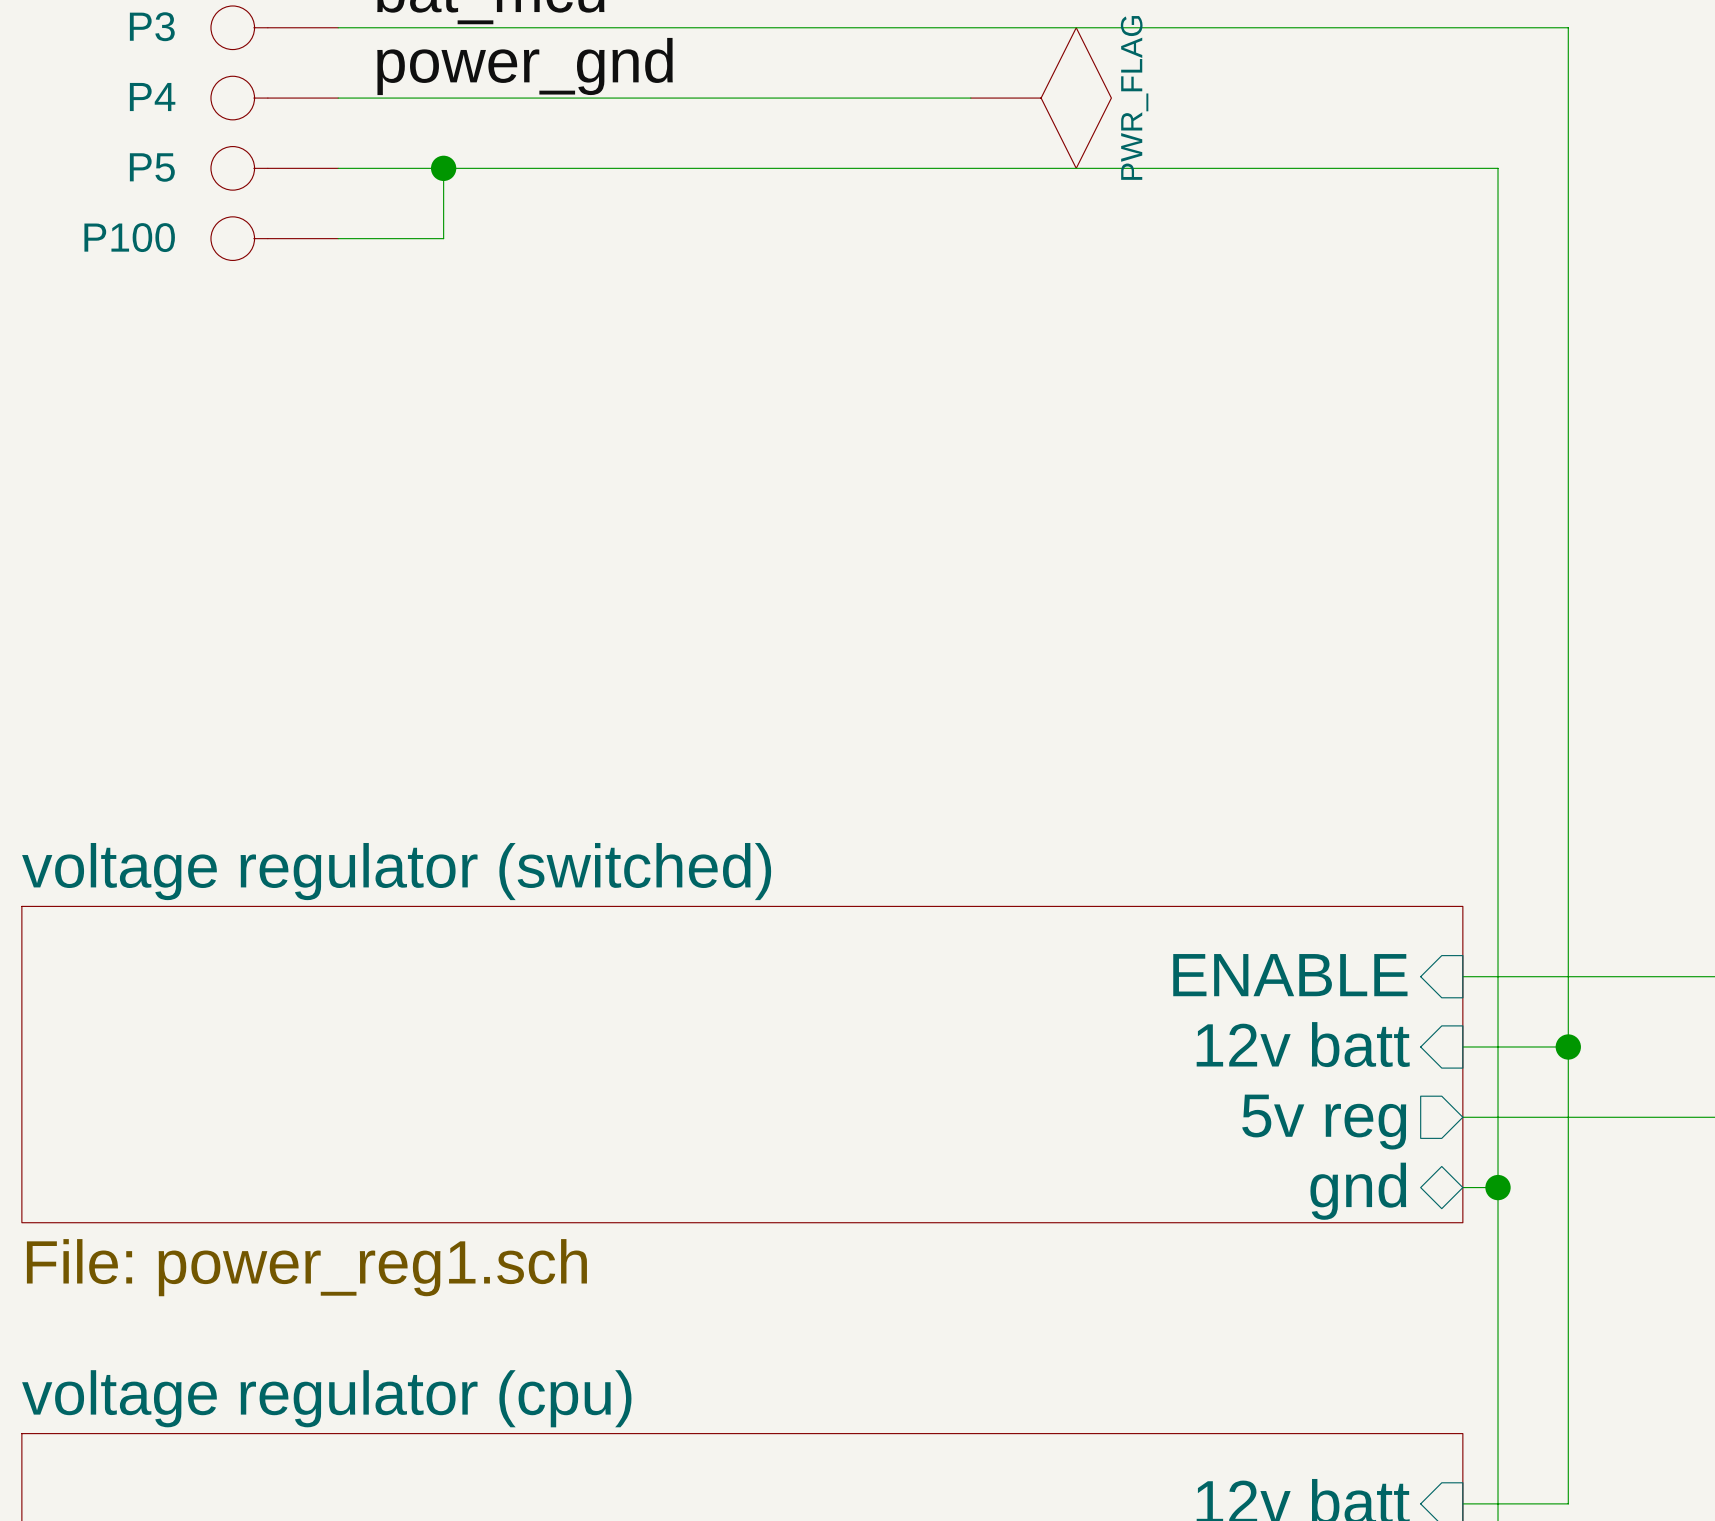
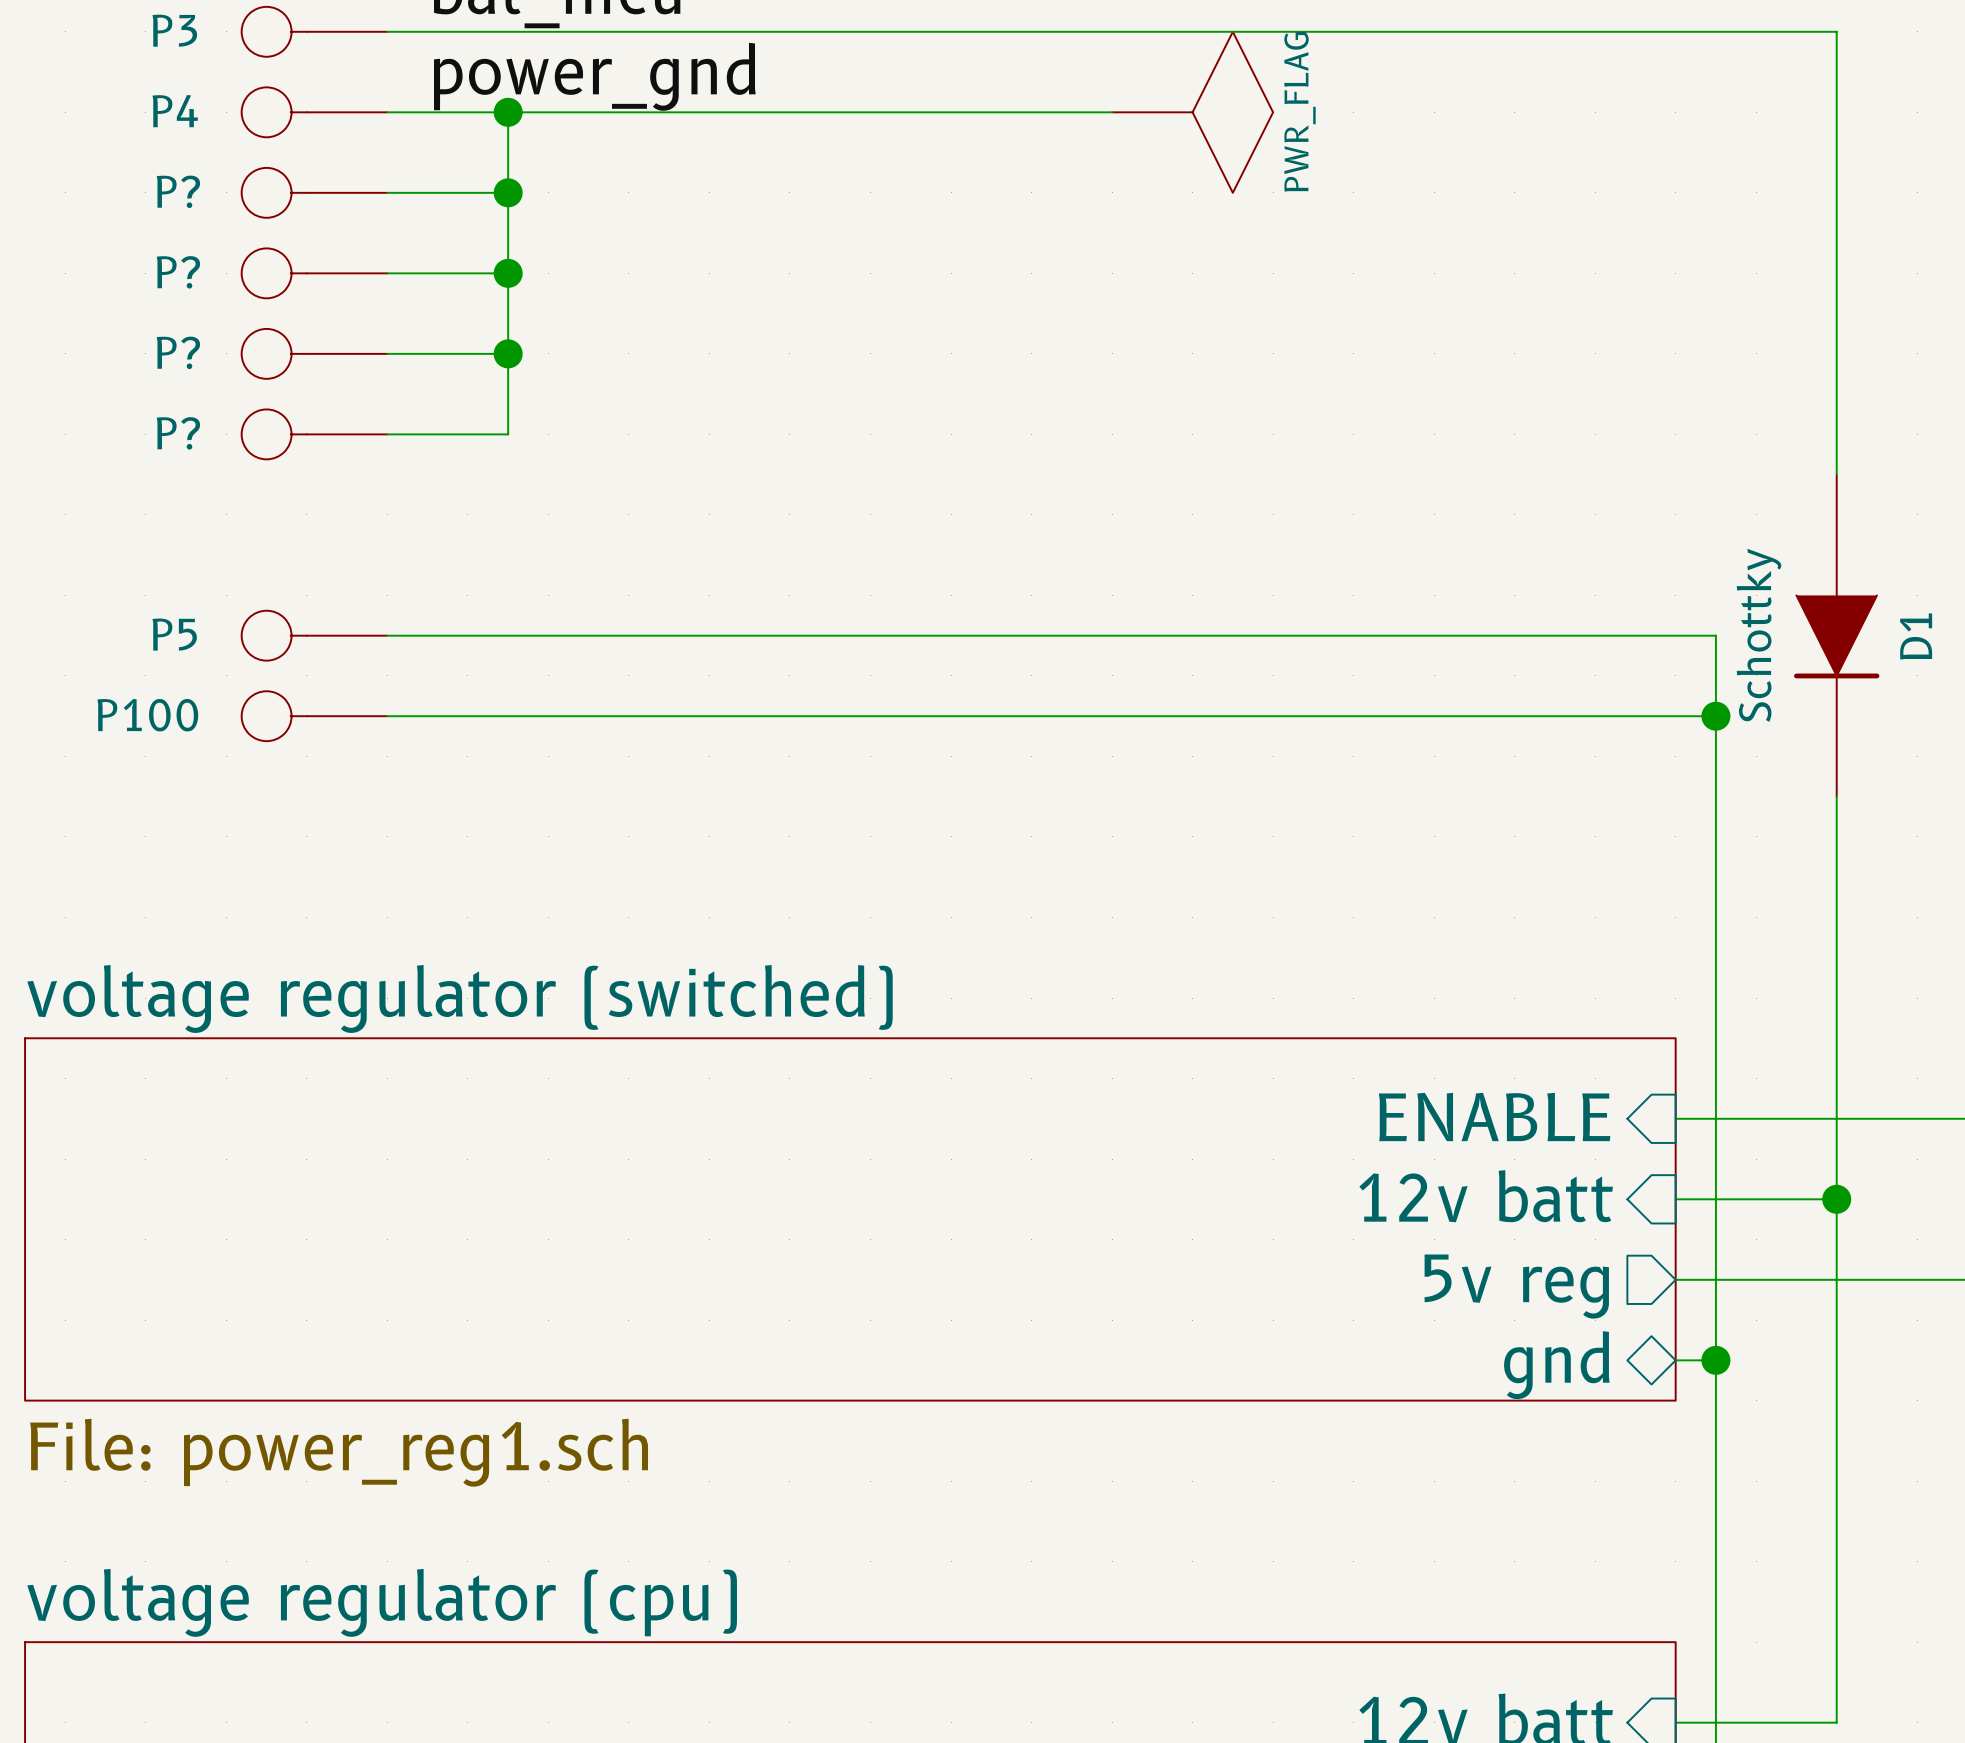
wire: (1568, 27) (1568, 1503) -> (1836, 796) (1836, 1722) (1796, 1722)
wire: none -> (1796, 31) (1836, 31) (1836, 474)
wire: none -> (508, 112) (508, 192)
junction: none -> (508, 112)
P5 name: P5 (152, 167) -> P? (178, 191)
wire: (443, 168) (1498, 168) (1498, 554) -> (387, 635) (1715, 635)
P100 name: P100 (129, 237) -> P? (178, 272)
wire: none -> (508, 273) (508, 434) (387, 434)
junction: none -> (508, 273)
P?: none -> (314, 353)
wire: none -> (387, 353) (508, 353)
junction: none -> (508, 353)
P?: none -> (314, 434)
P5: none -> (314, 635)
D1: none -> Schottky (1836, 635)
P100: none -> (314, 716)
wire: none -> (387, 716) (1715, 716)
junction: none -> (1715, 716)
wire: none -> (1796, 1199) (1836, 1199)
junction position: (1568, 1046) -> (1836, 1199)

